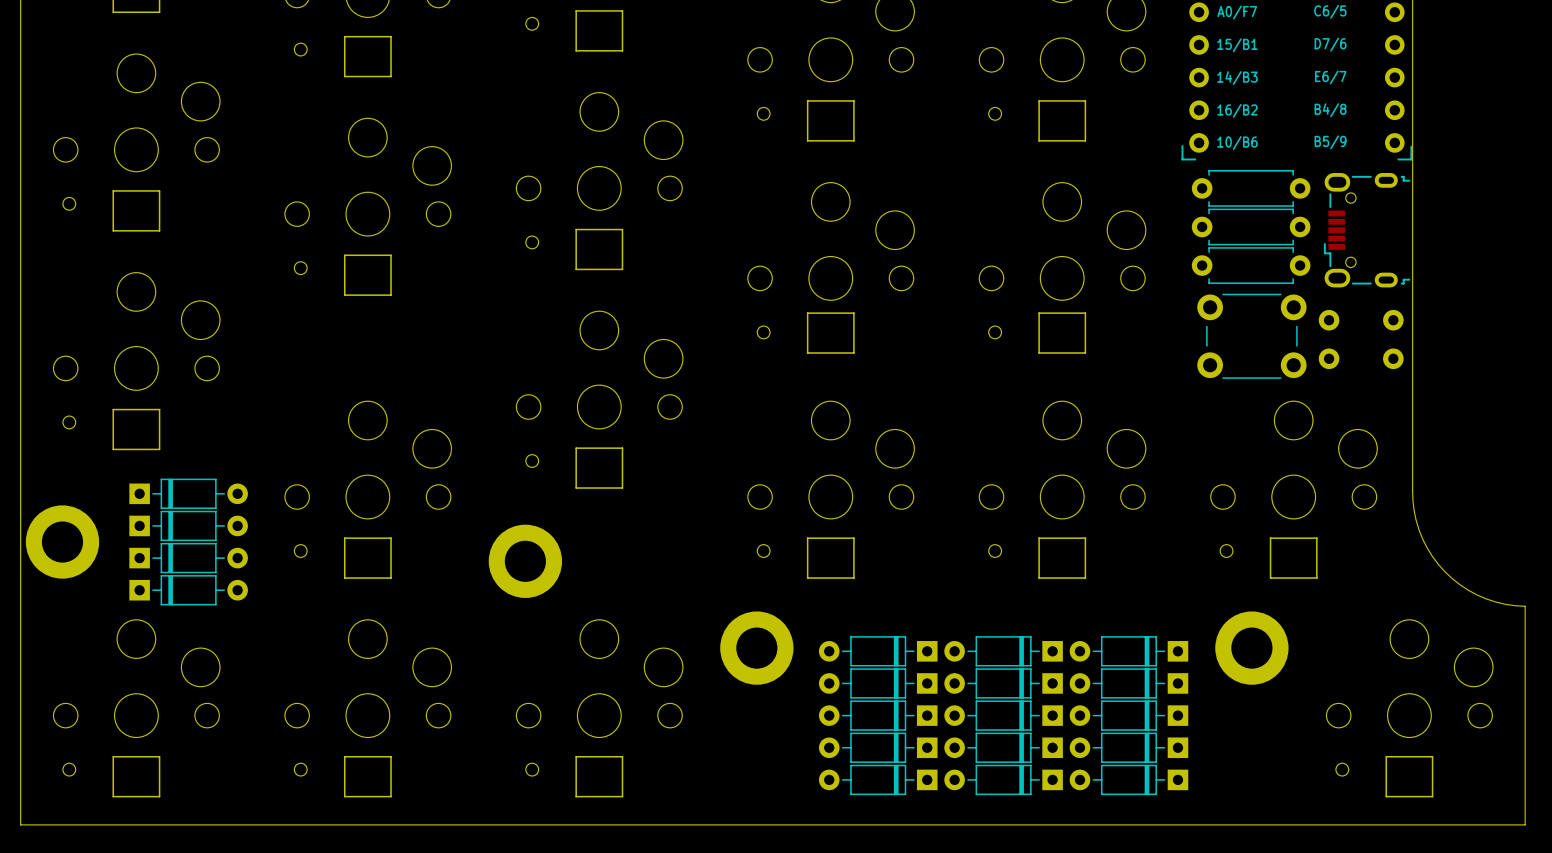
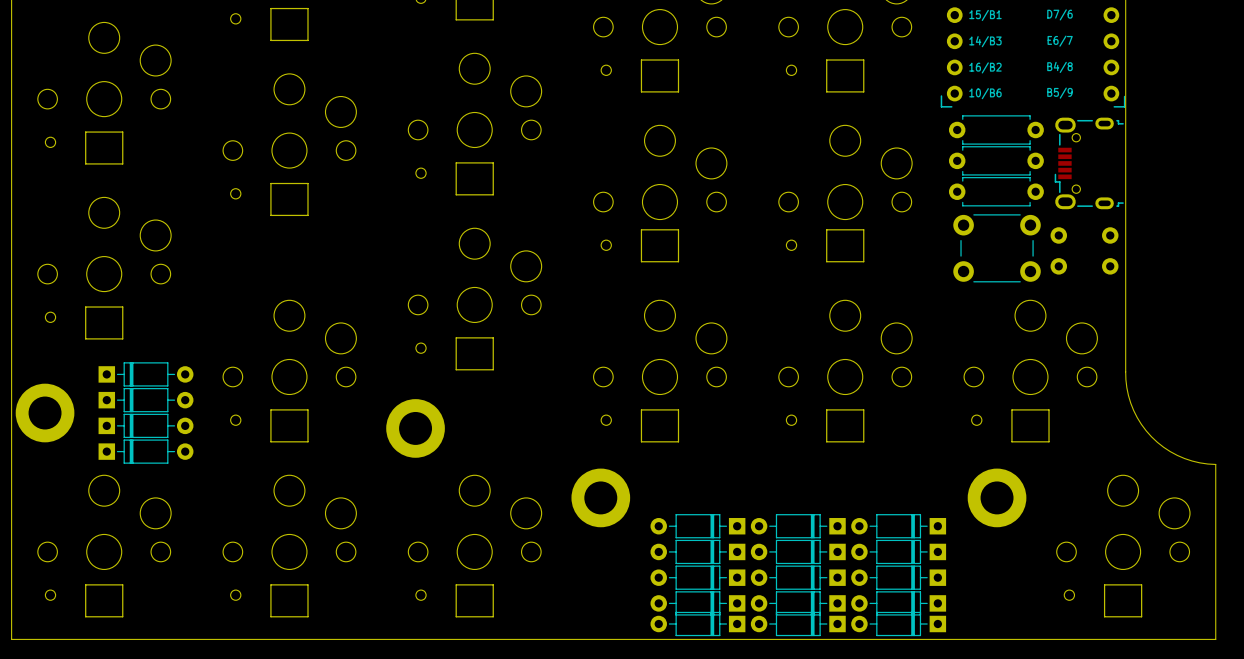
part: (878, 651) -> none
part: (1003, 651) -> none
part: (1128, 651) -> none
part: none -> (697, 623)
part: none -> (798, 623)
part: none -> (898, 623)

